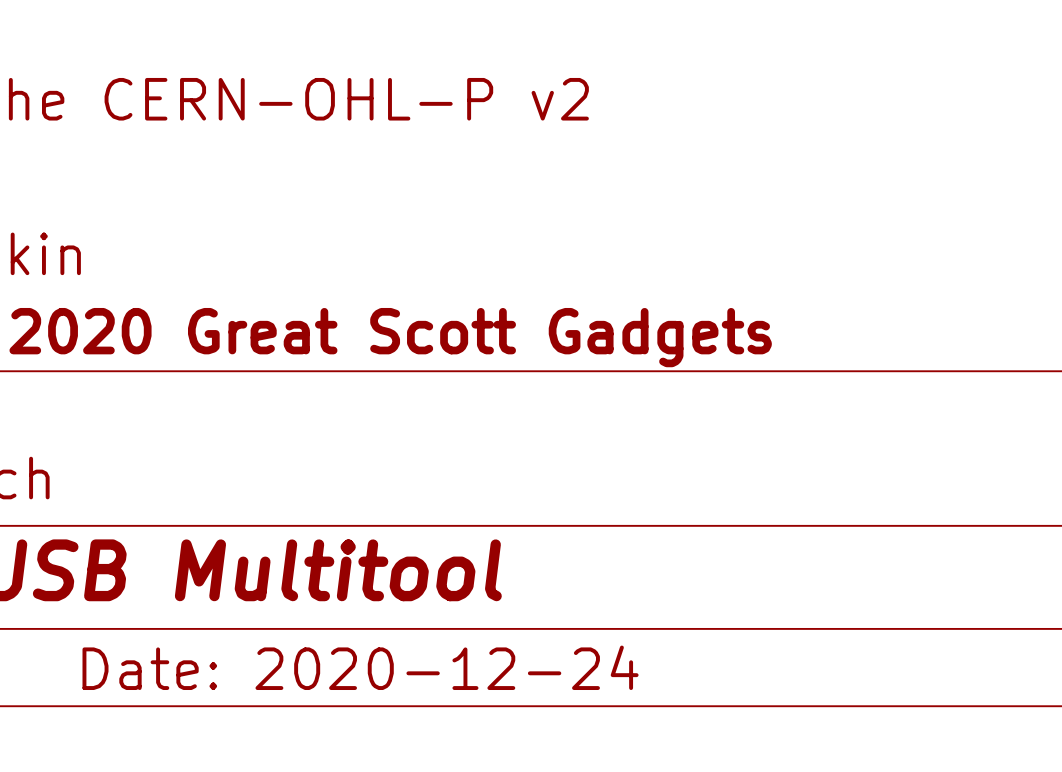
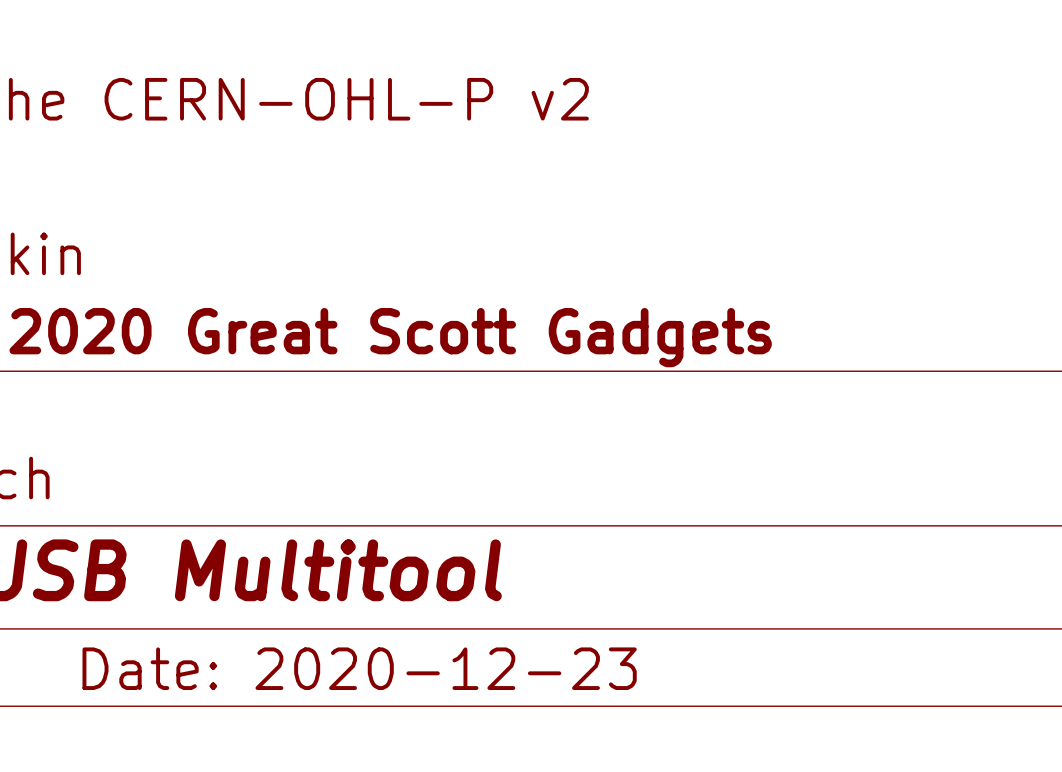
title block: Date: 2020-12-24 (360, 667) -> Date: 2020-12-23 (359, 668)

